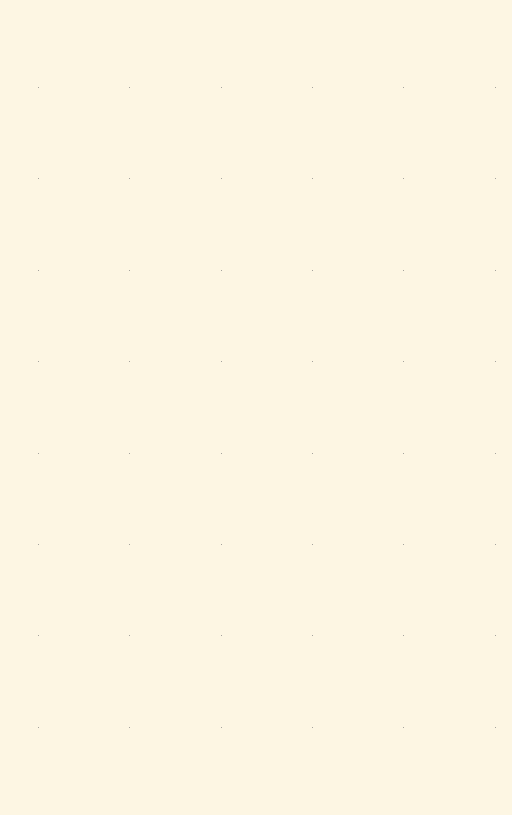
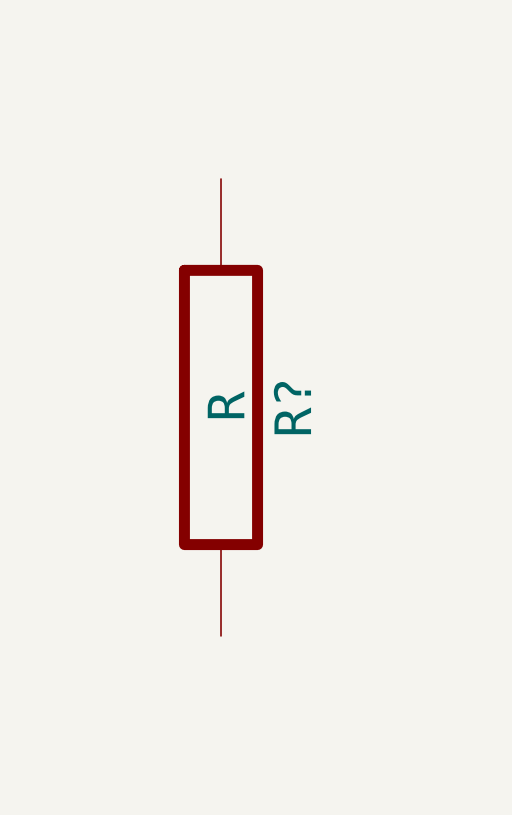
R?: none -> R (221, 407)

